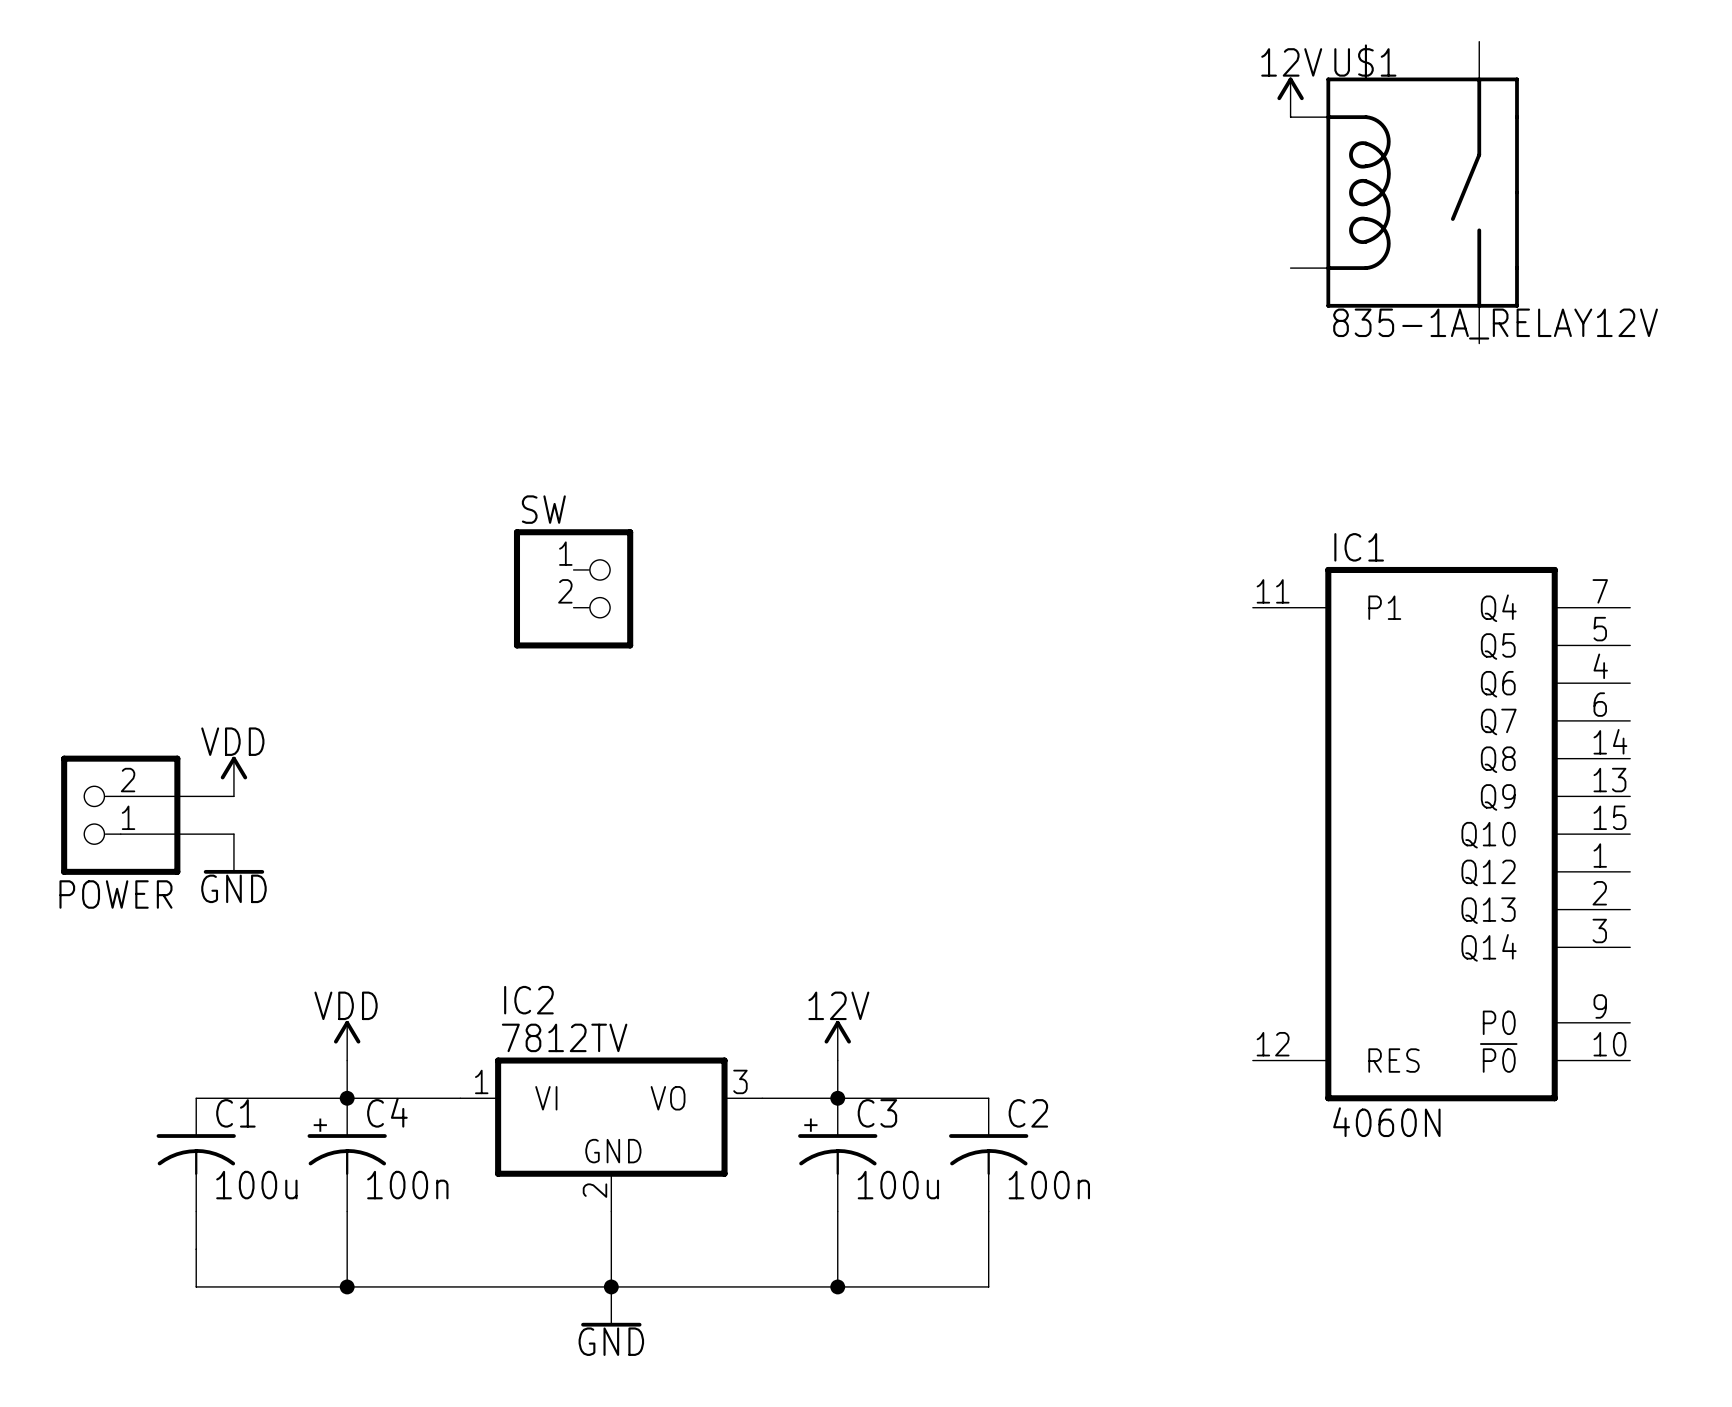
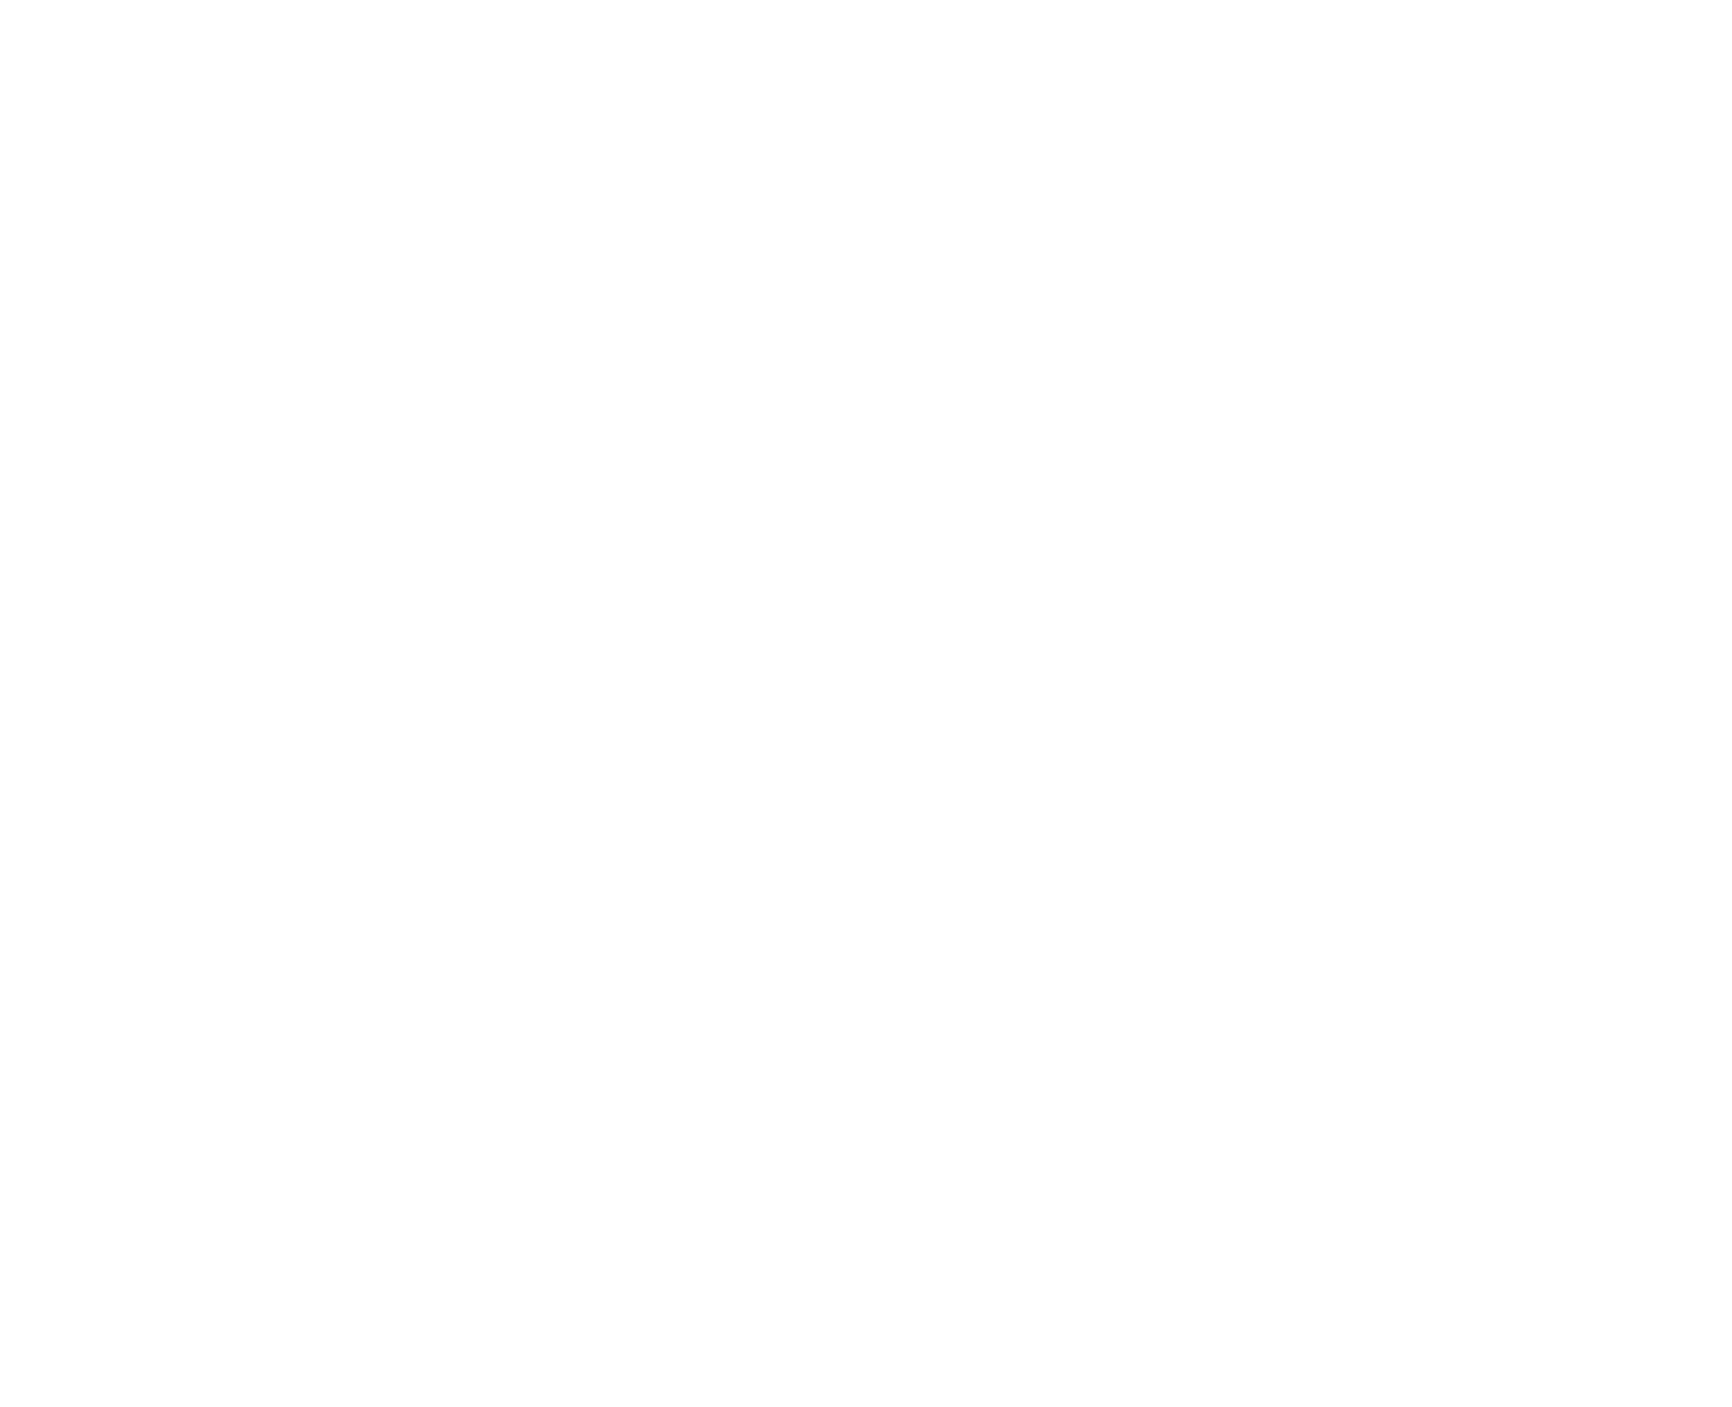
power symbol: 12V (1290, 97) -> none
U$1: 835-1A_RELAY12V (1404, 192) -> none
SW: (573, 588) -> none
power symbol: VDD (233, 776) -> none
wire: (120, 796) (233, 796) -> none
POWER: (120, 815) -> none
wire: (120, 834) (233, 834) -> none
IC1: 4060N (1441, 834) -> none
power symbol: GND (233, 853) -> none
power symbol: VDD (347, 1040) -> none
power symbol: 12V (837, 1040) -> none
wire: (347, 1060) (347, 1098) -> none
wire: (837, 1060) (837, 1098) -> none
wire: (196, 1098) (460, 1098) -> none
junction: (347, 1098) -> none
wire: (762, 1098) (988, 1098) -> none
junction: (837, 1098) -> none
IC2: 7812TV (611, 1134) -> none
C1: 100u (196, 1154) -> none
C4: 100n (347, 1154) -> none
C3: 100u (837, 1154) -> none
C2: 100n (988, 1154) -> none
wire: (196, 1211) (196, 1286) (988, 1286) (988, 1211) -> none
wire: (347, 1211) (347, 1286) -> none
wire: (611, 1211) (611, 1286) -> none
wire: (837, 1211) (837, 1286) -> none
junction: (347, 1286) -> none
junction: (611, 1286) -> none
junction: (837, 1286) -> none
power symbol: GND (611, 1306) -> none

